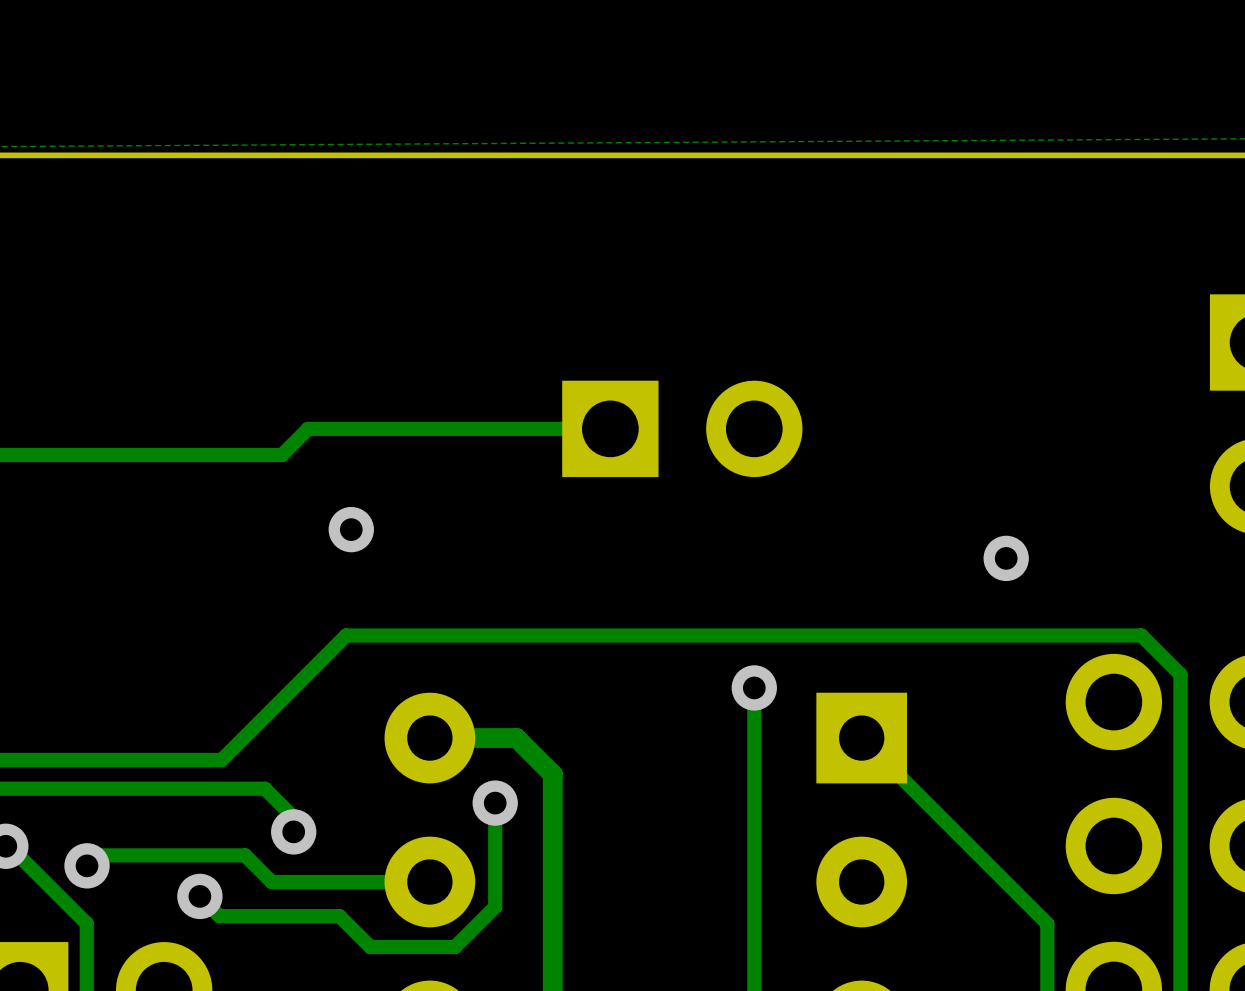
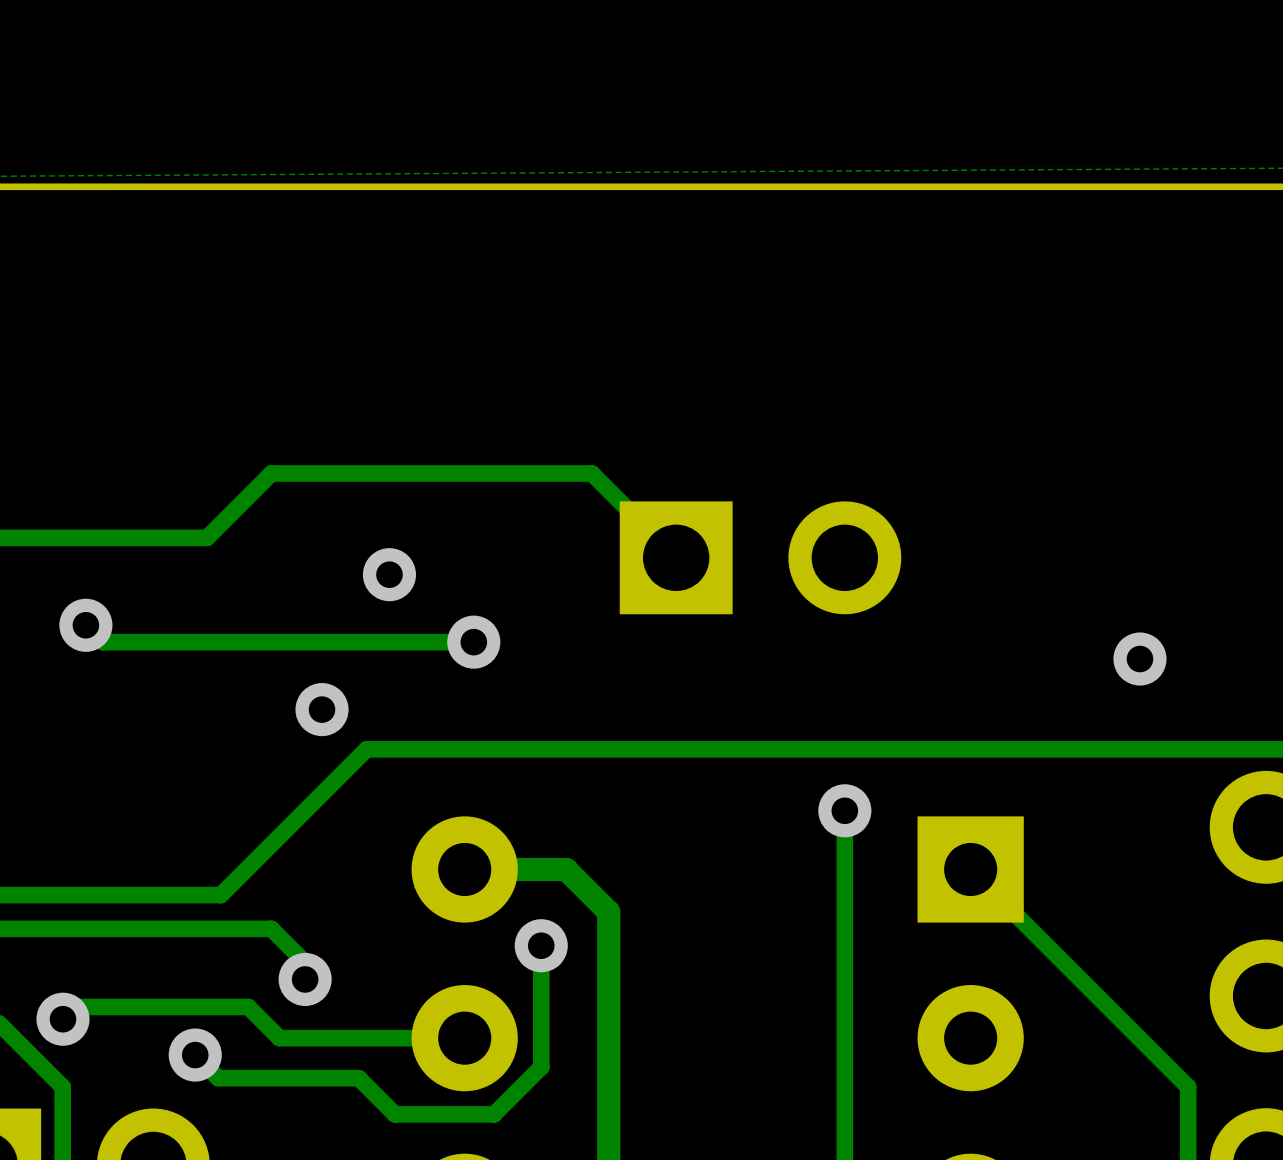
track: (610, 428) (308, 428) (281, 455) (209, 455) -> (676, 557) (591, 473) (271, 473) (207, 537)
part position: (682, 428) -> (760, 557)
track: none -> (85, 625) (102, 642) (473, 642)
via: none -> (85, 625)
via position: (351, 529) -> (389, 574)
via: none -> (473, 642)
via: none -> (322, 709)

